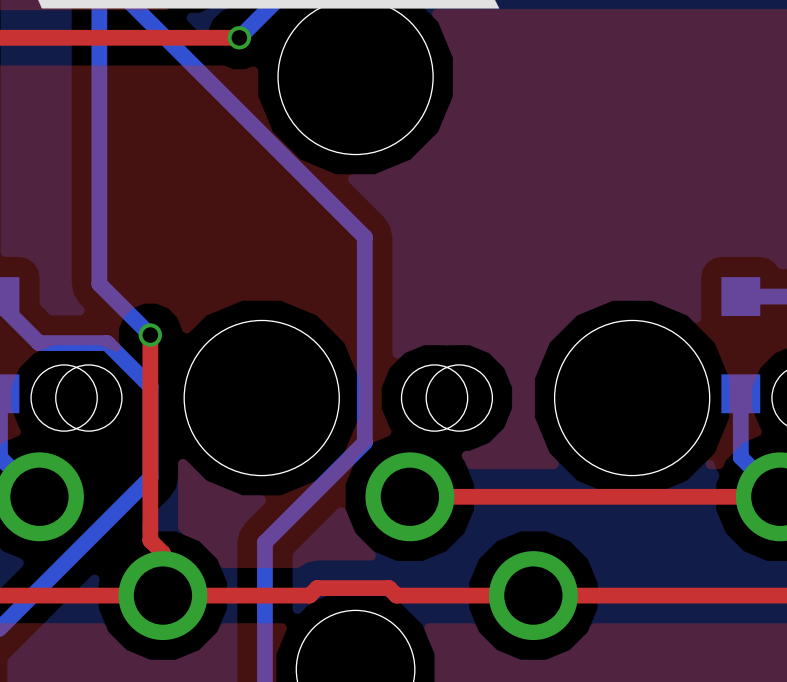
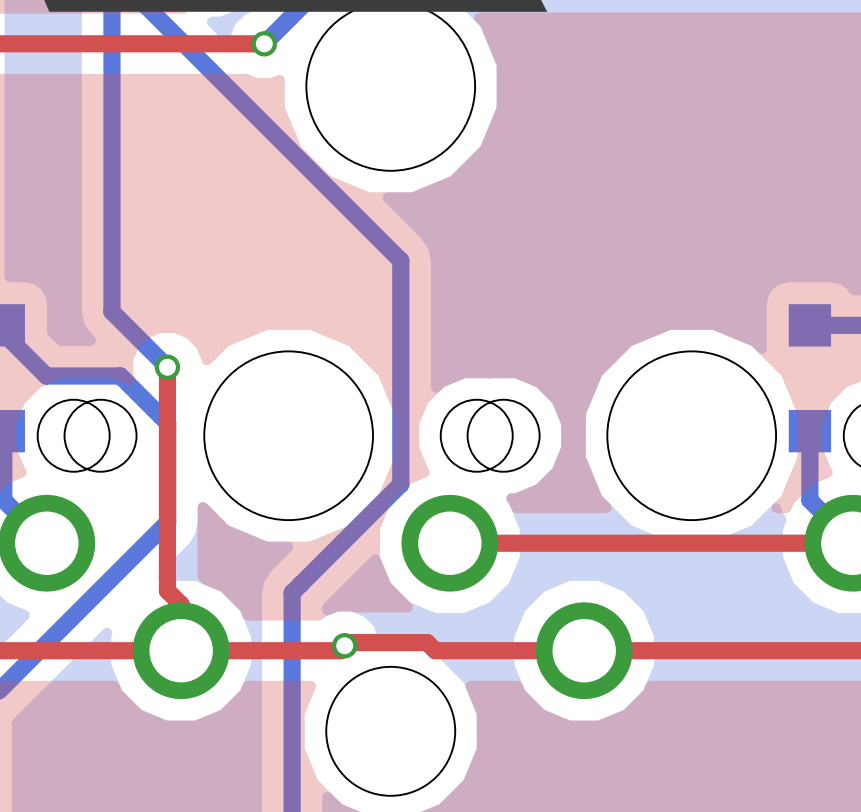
via: none -> (344, 645)

